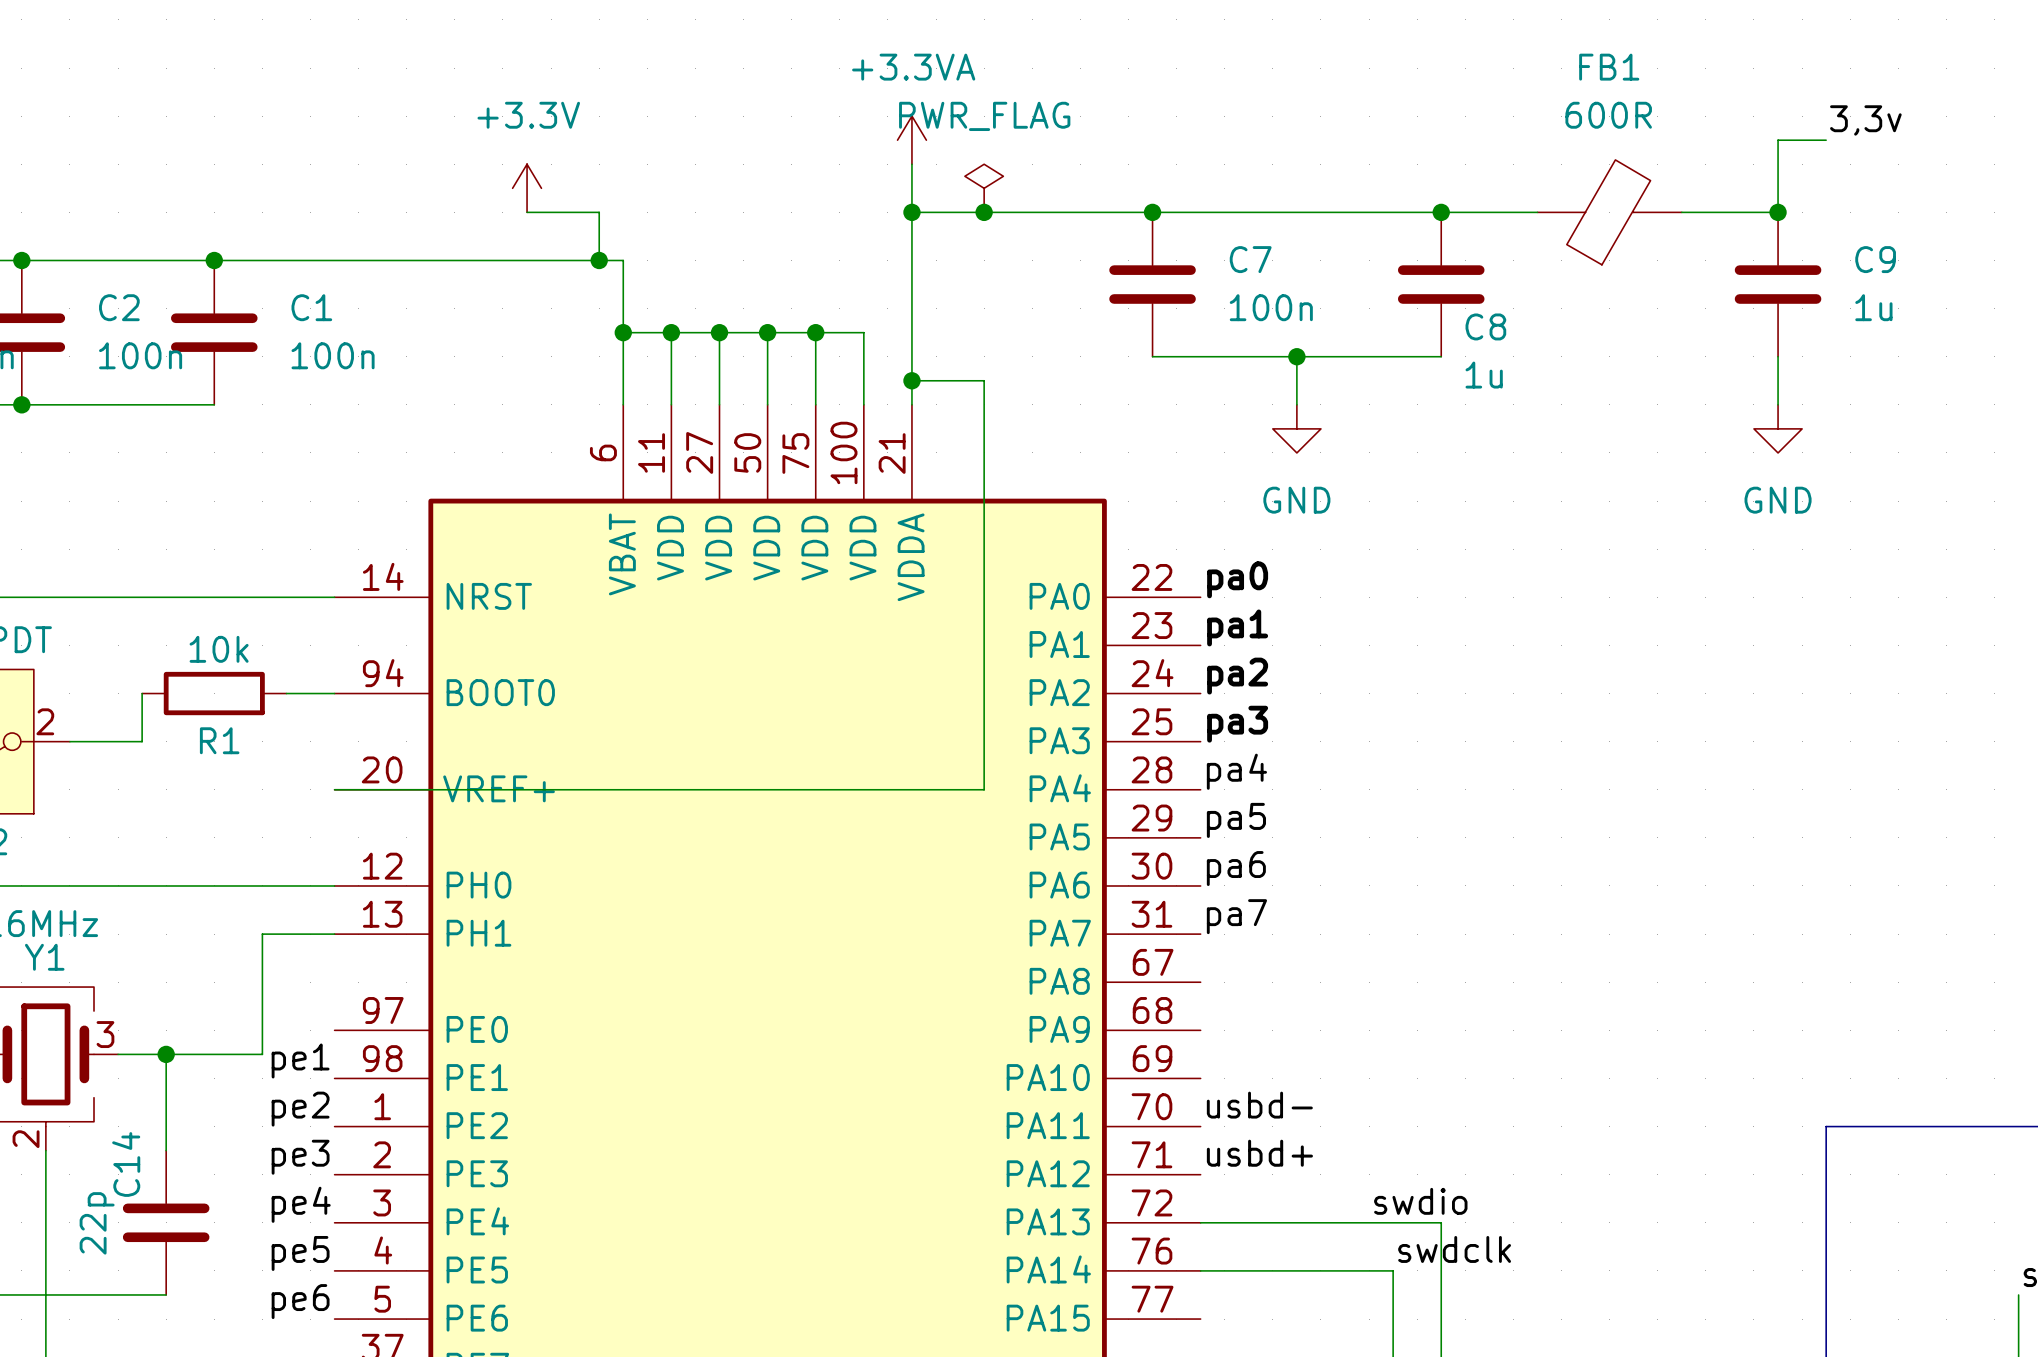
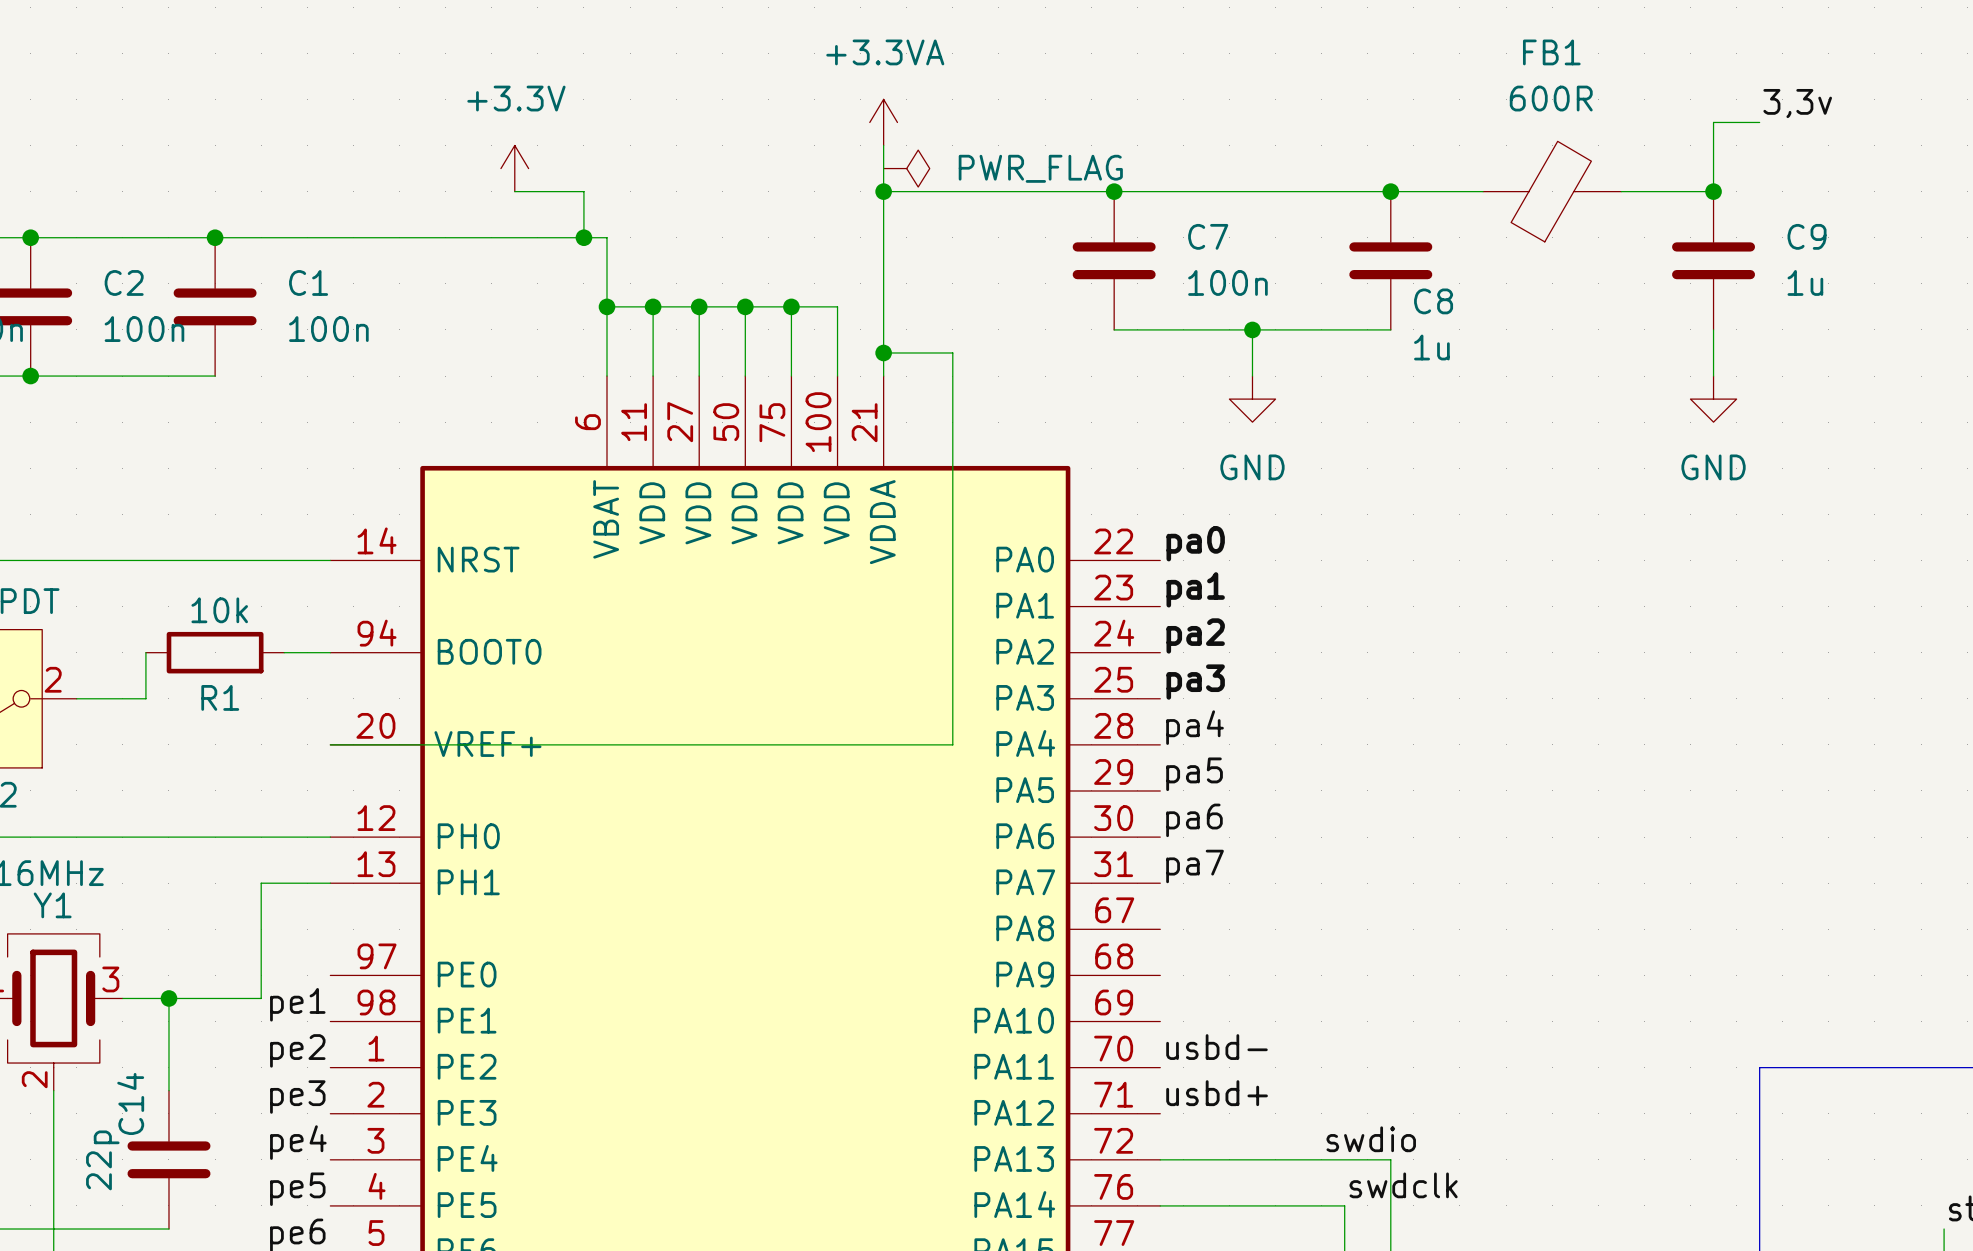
power symbol text position: PWR_FLAG (984, 116) -> PWR_FLAG (1040, 168)
power symbol rotation: 0° (984, 188) -> 90° clockwise (906, 168)
power symbol position: PWR_FLAG (984, 188) -> PWR_FLAG (906, 168)
junction: (984, 212) -> none

